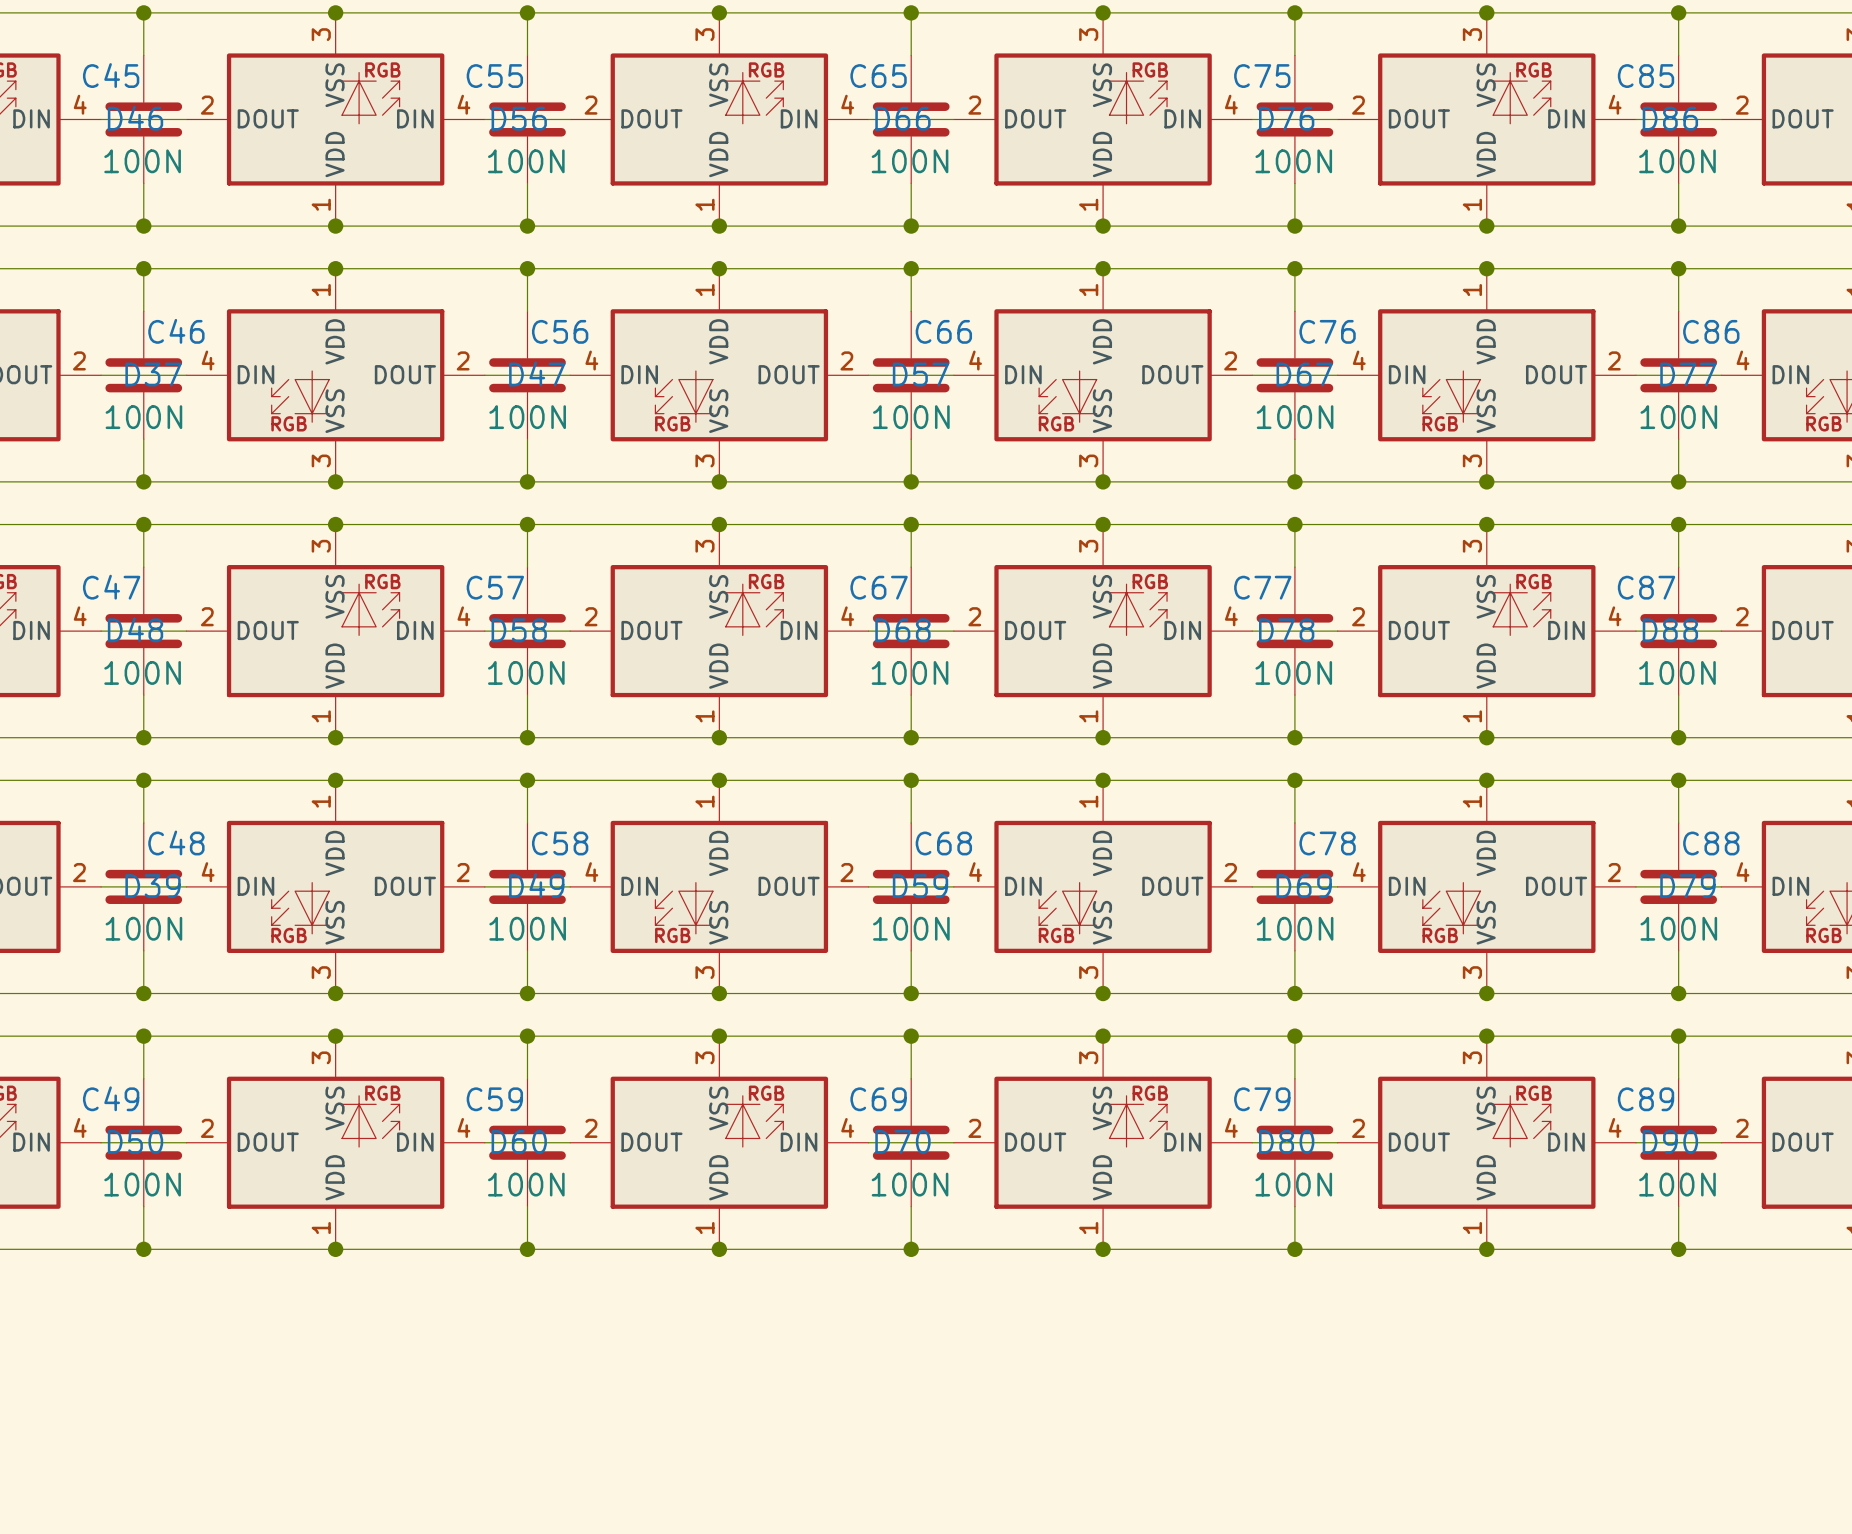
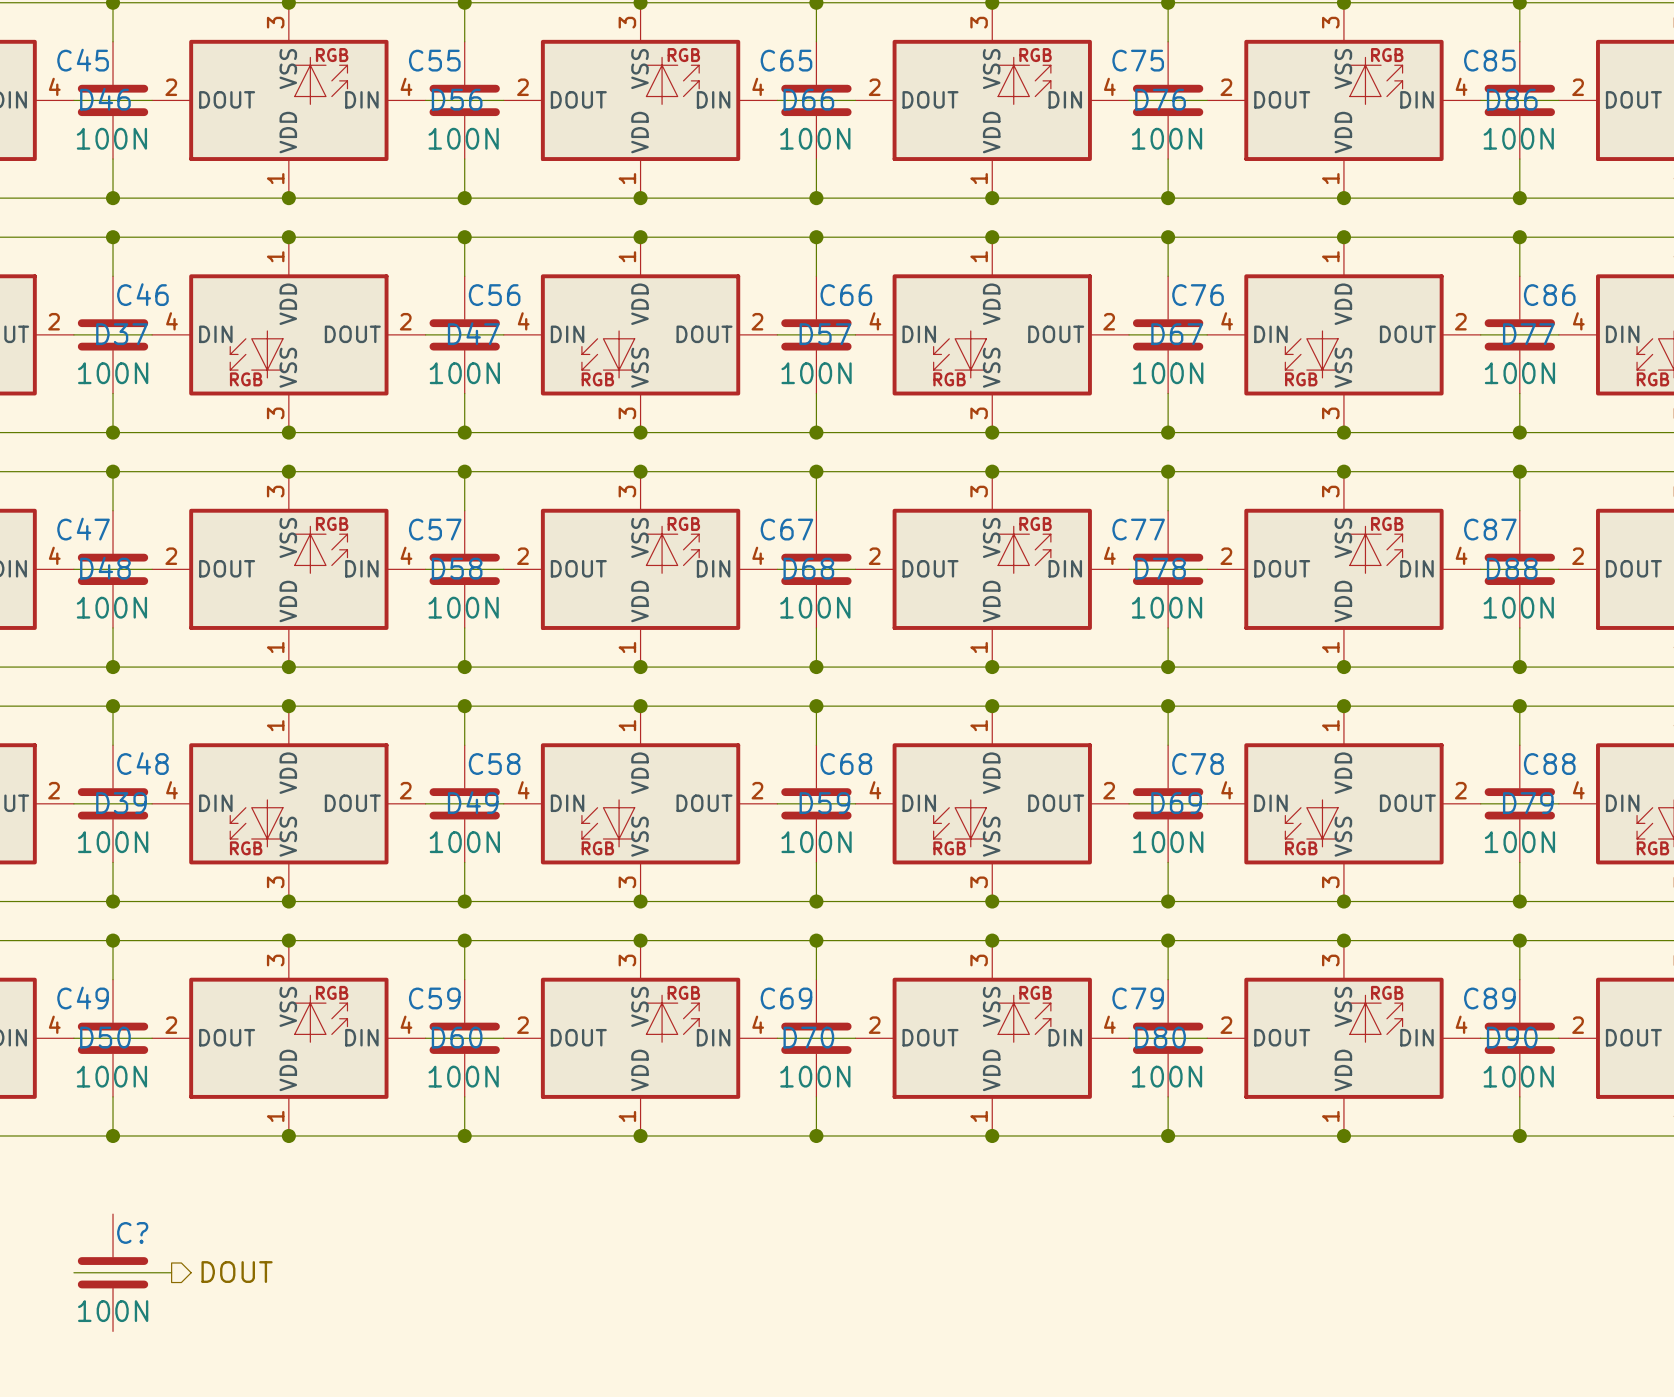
hierarchical label: none -> DOUT (237, 1272)
wire: none -> (73, 1272) (171, 1272)
C?: none -> 100N (113, 1272)

